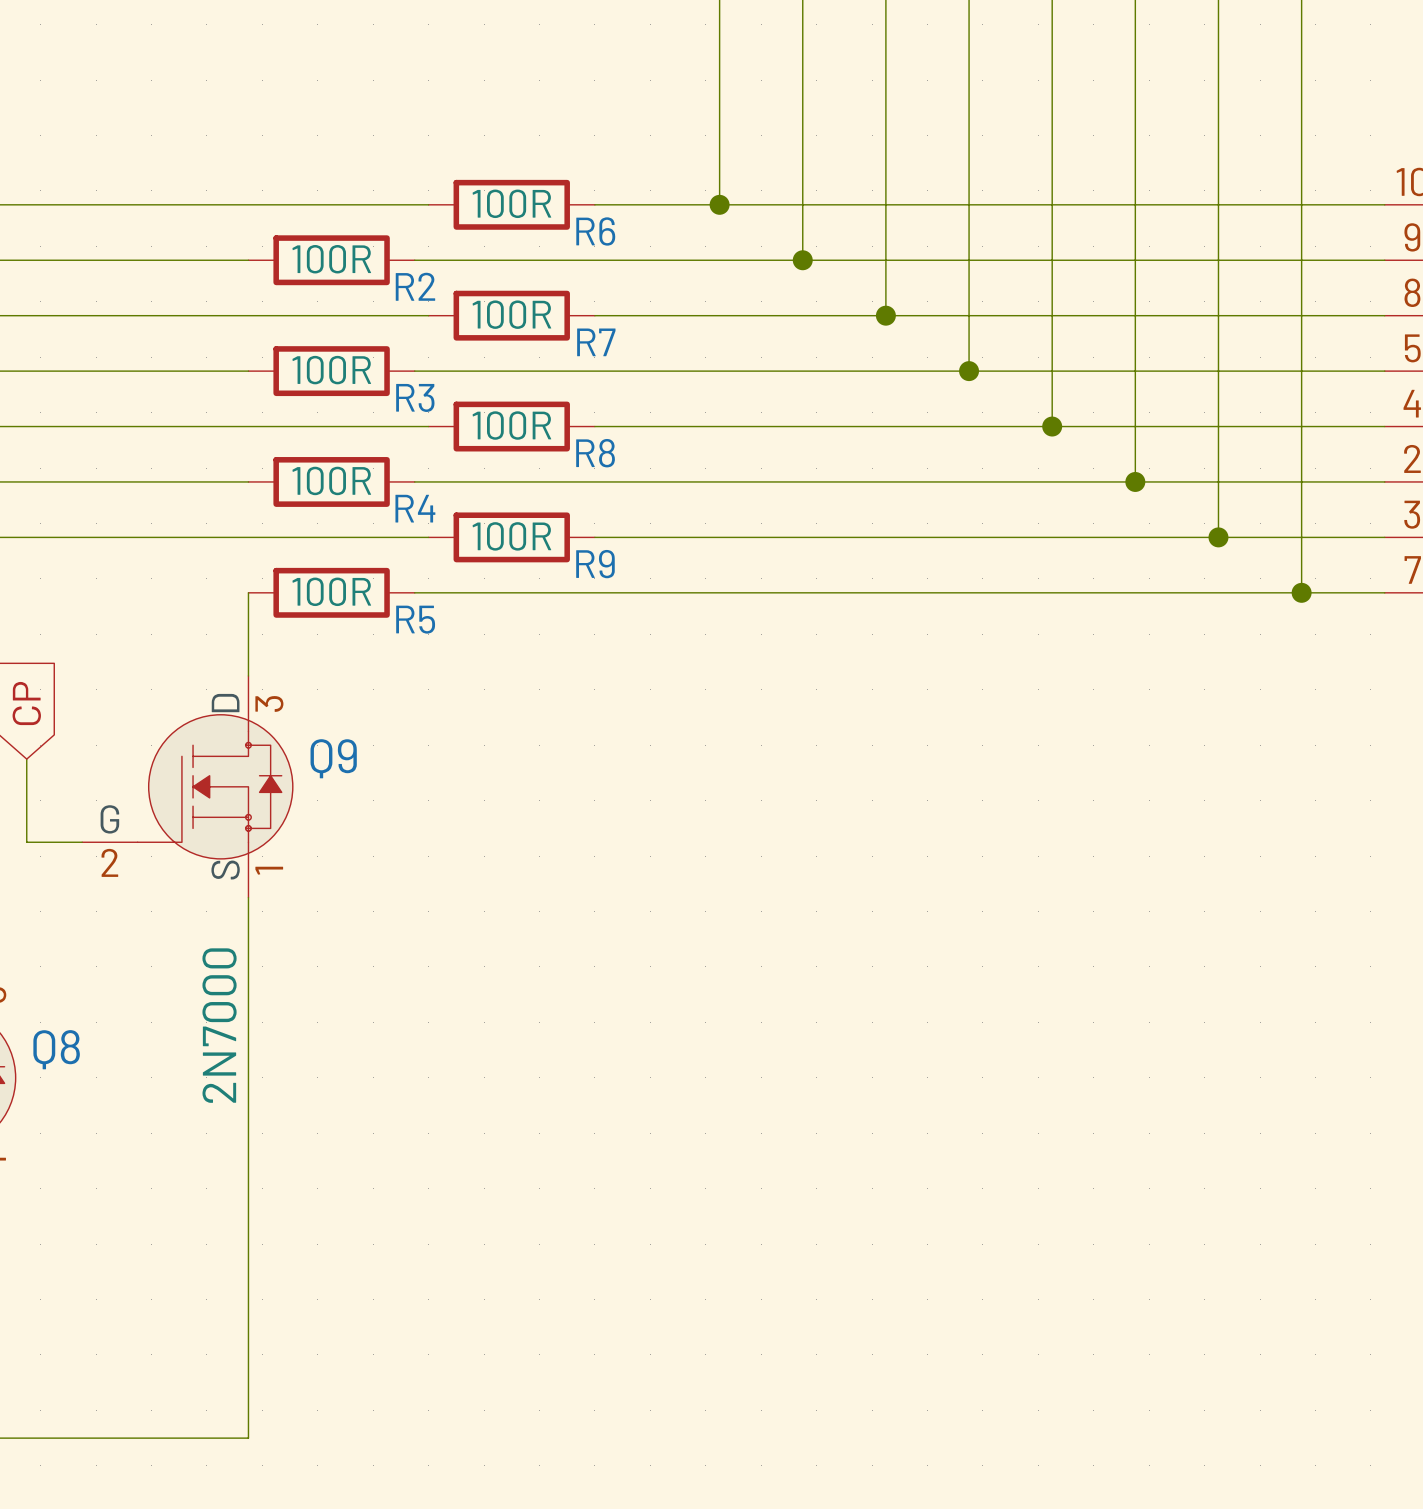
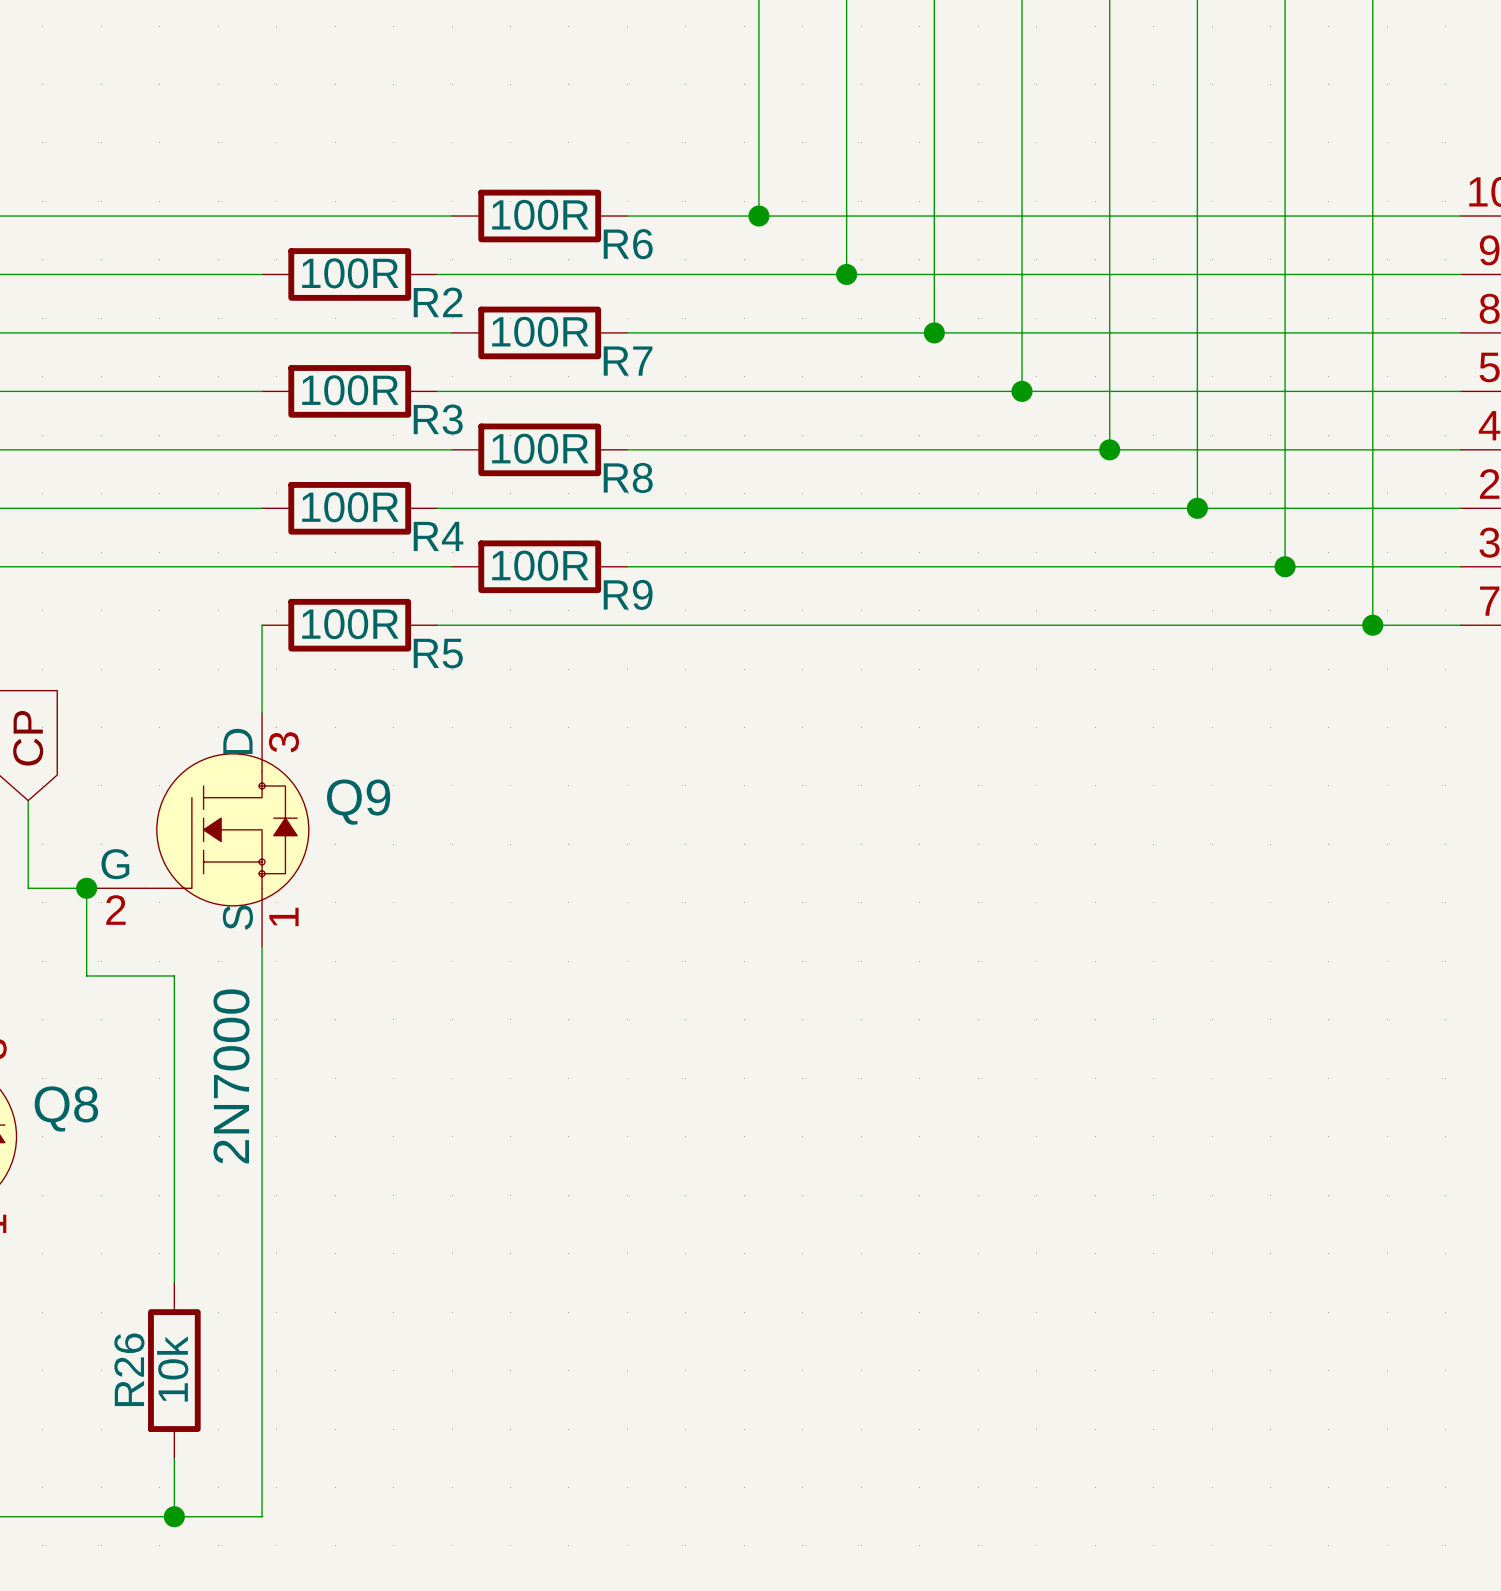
wire: none -> (86, 888) (86, 975) (174, 975) (174, 1282)
junction: none -> (86, 888)
R26: none -> 10k (174, 1370)
wire: none -> (174, 1458) (174, 1516)
junction: none -> (174, 1516)

